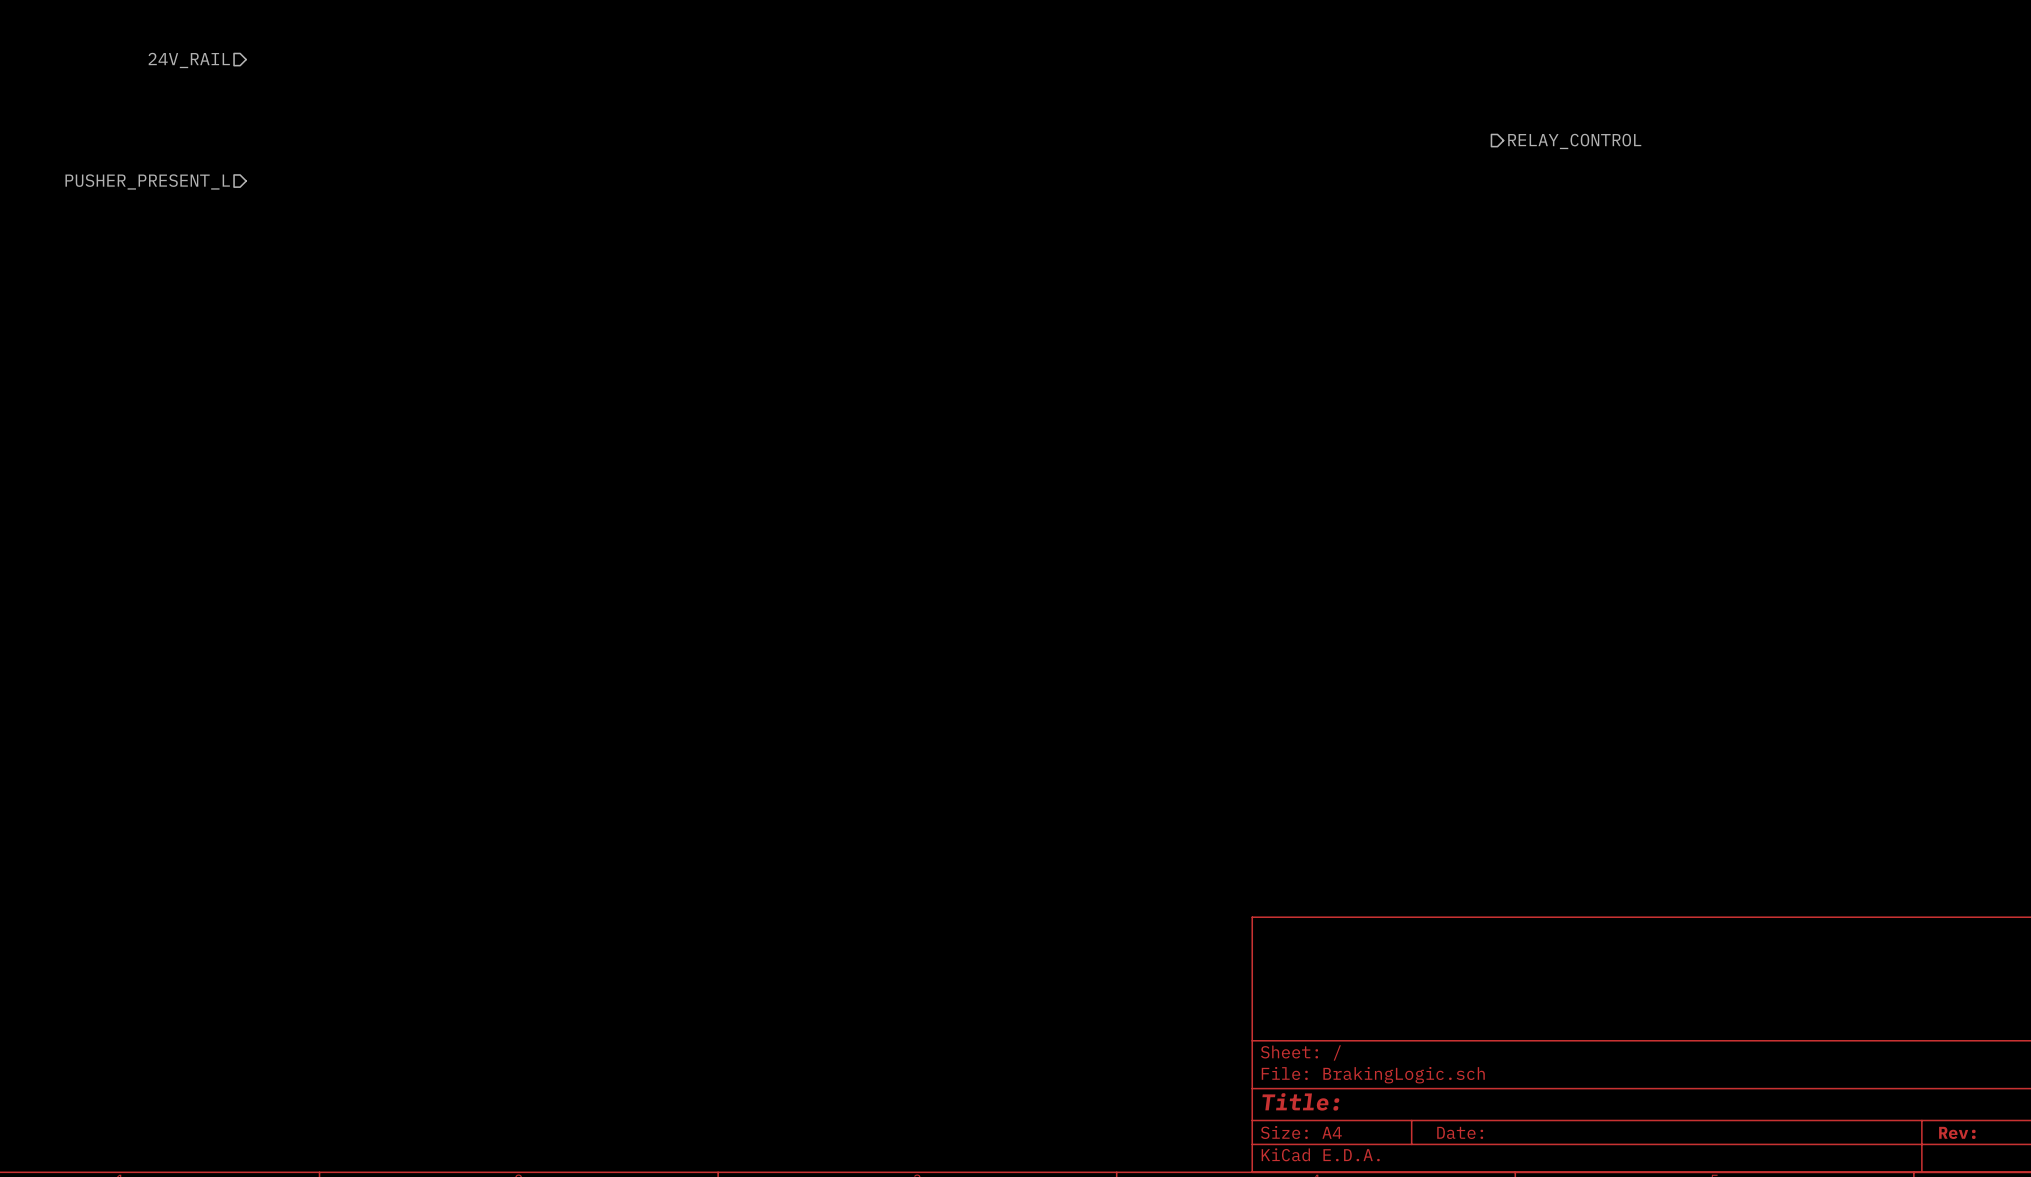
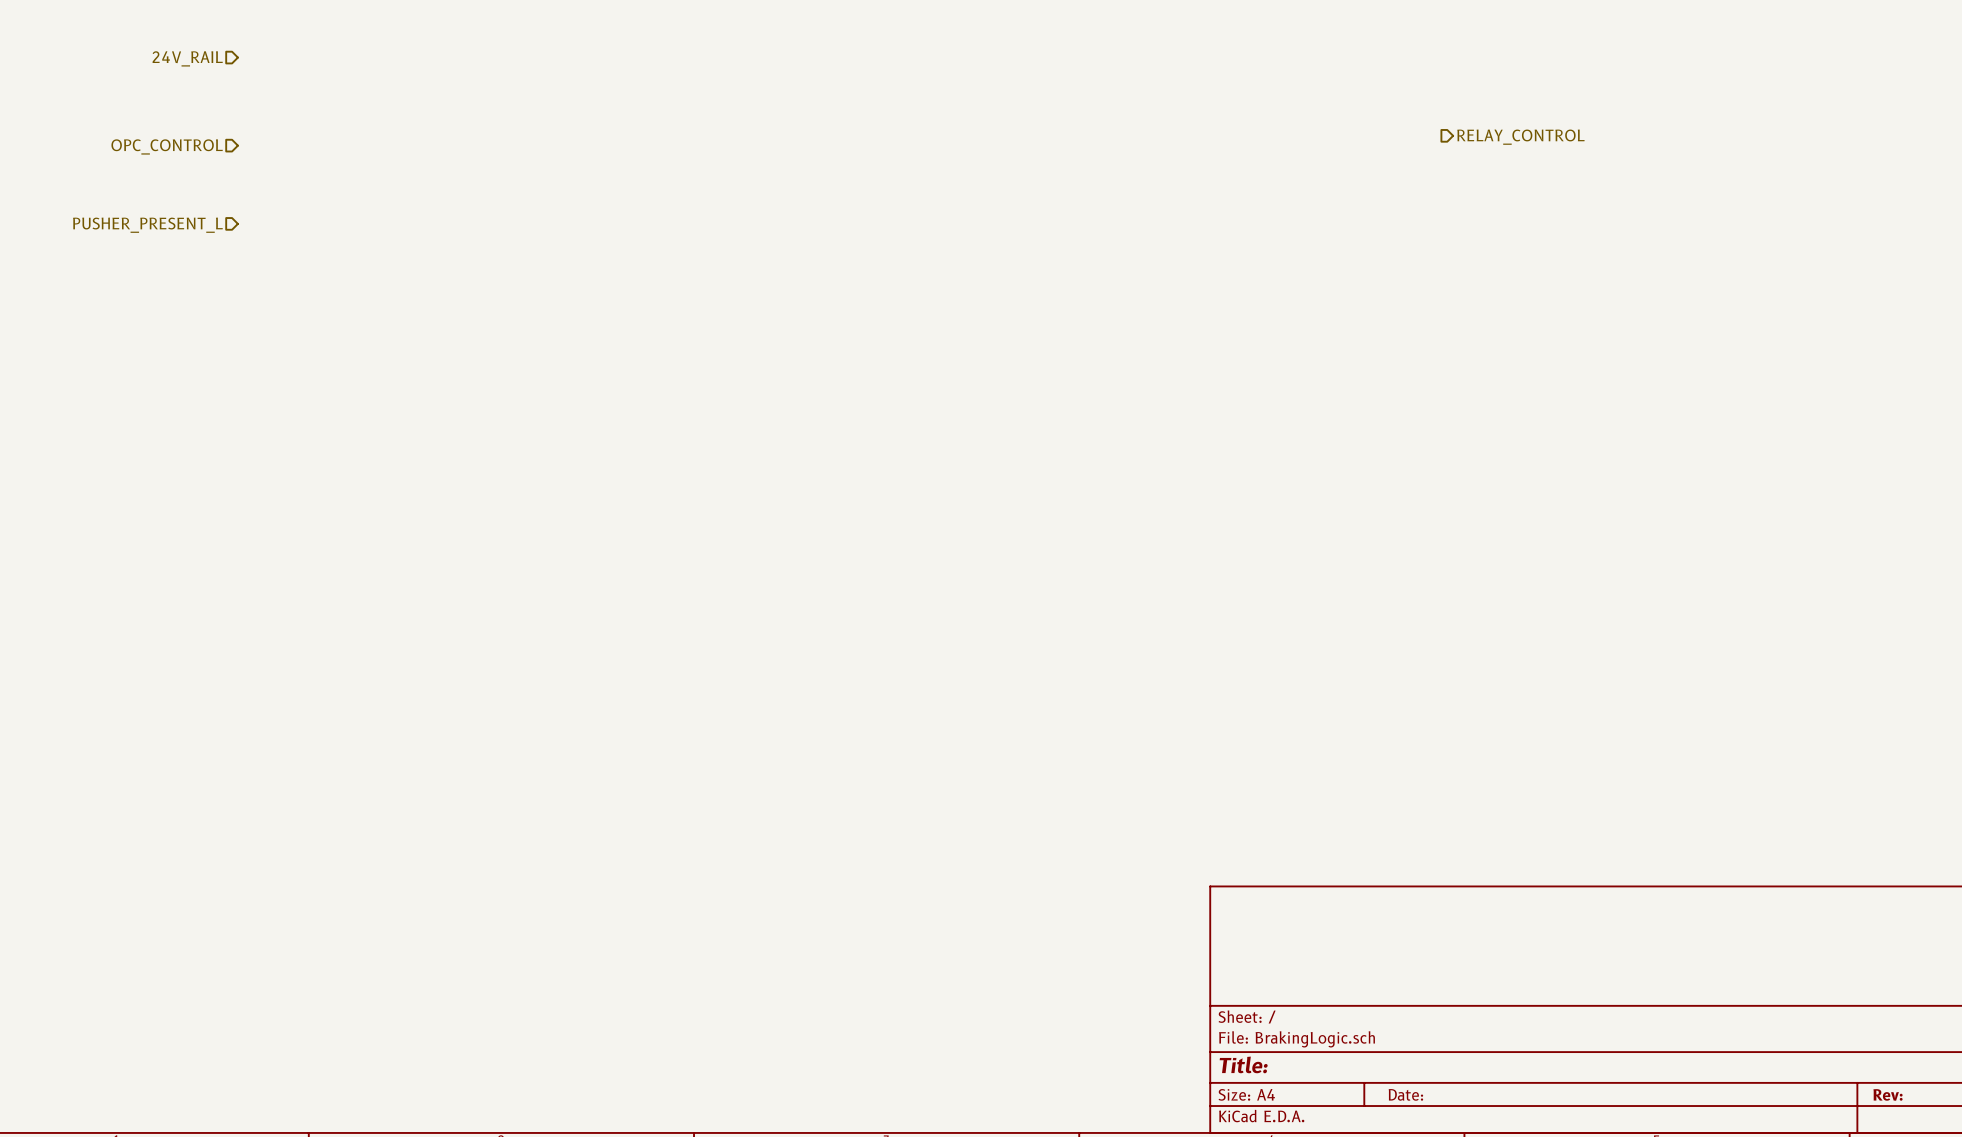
hierarchical label: none -> OPC_CONTROL (167, 146)
hierarchical label position: PUSHER_PRESENT_L (147, 181) -> PUSHER_PRESENT_L (147, 225)

